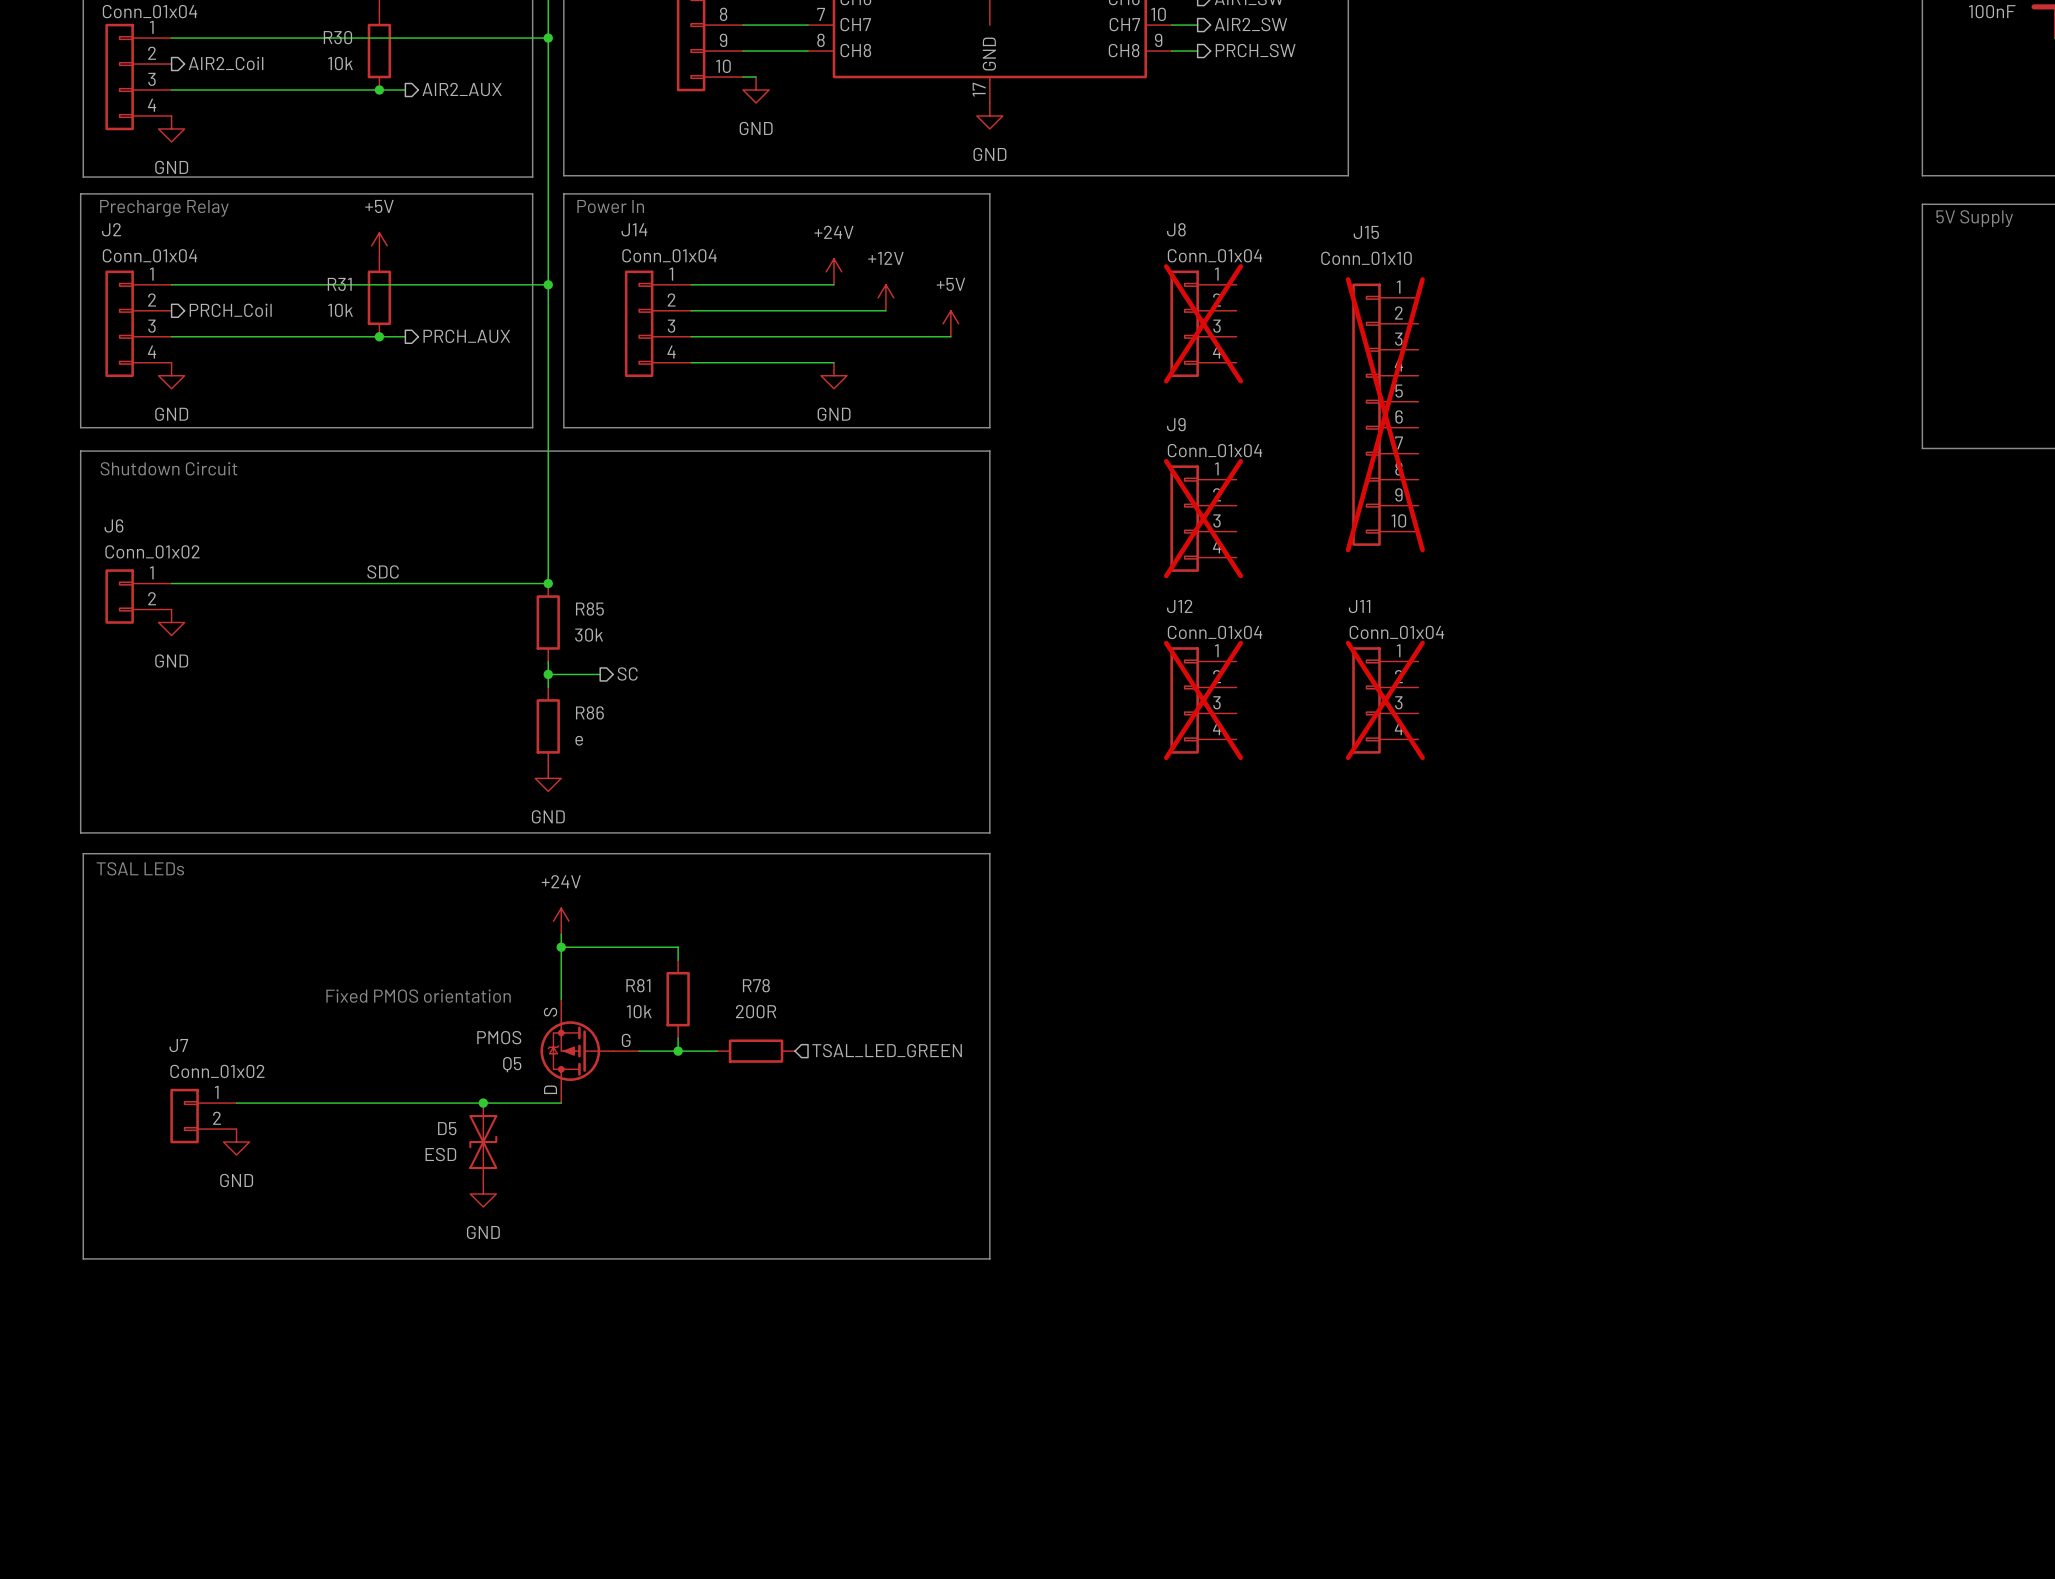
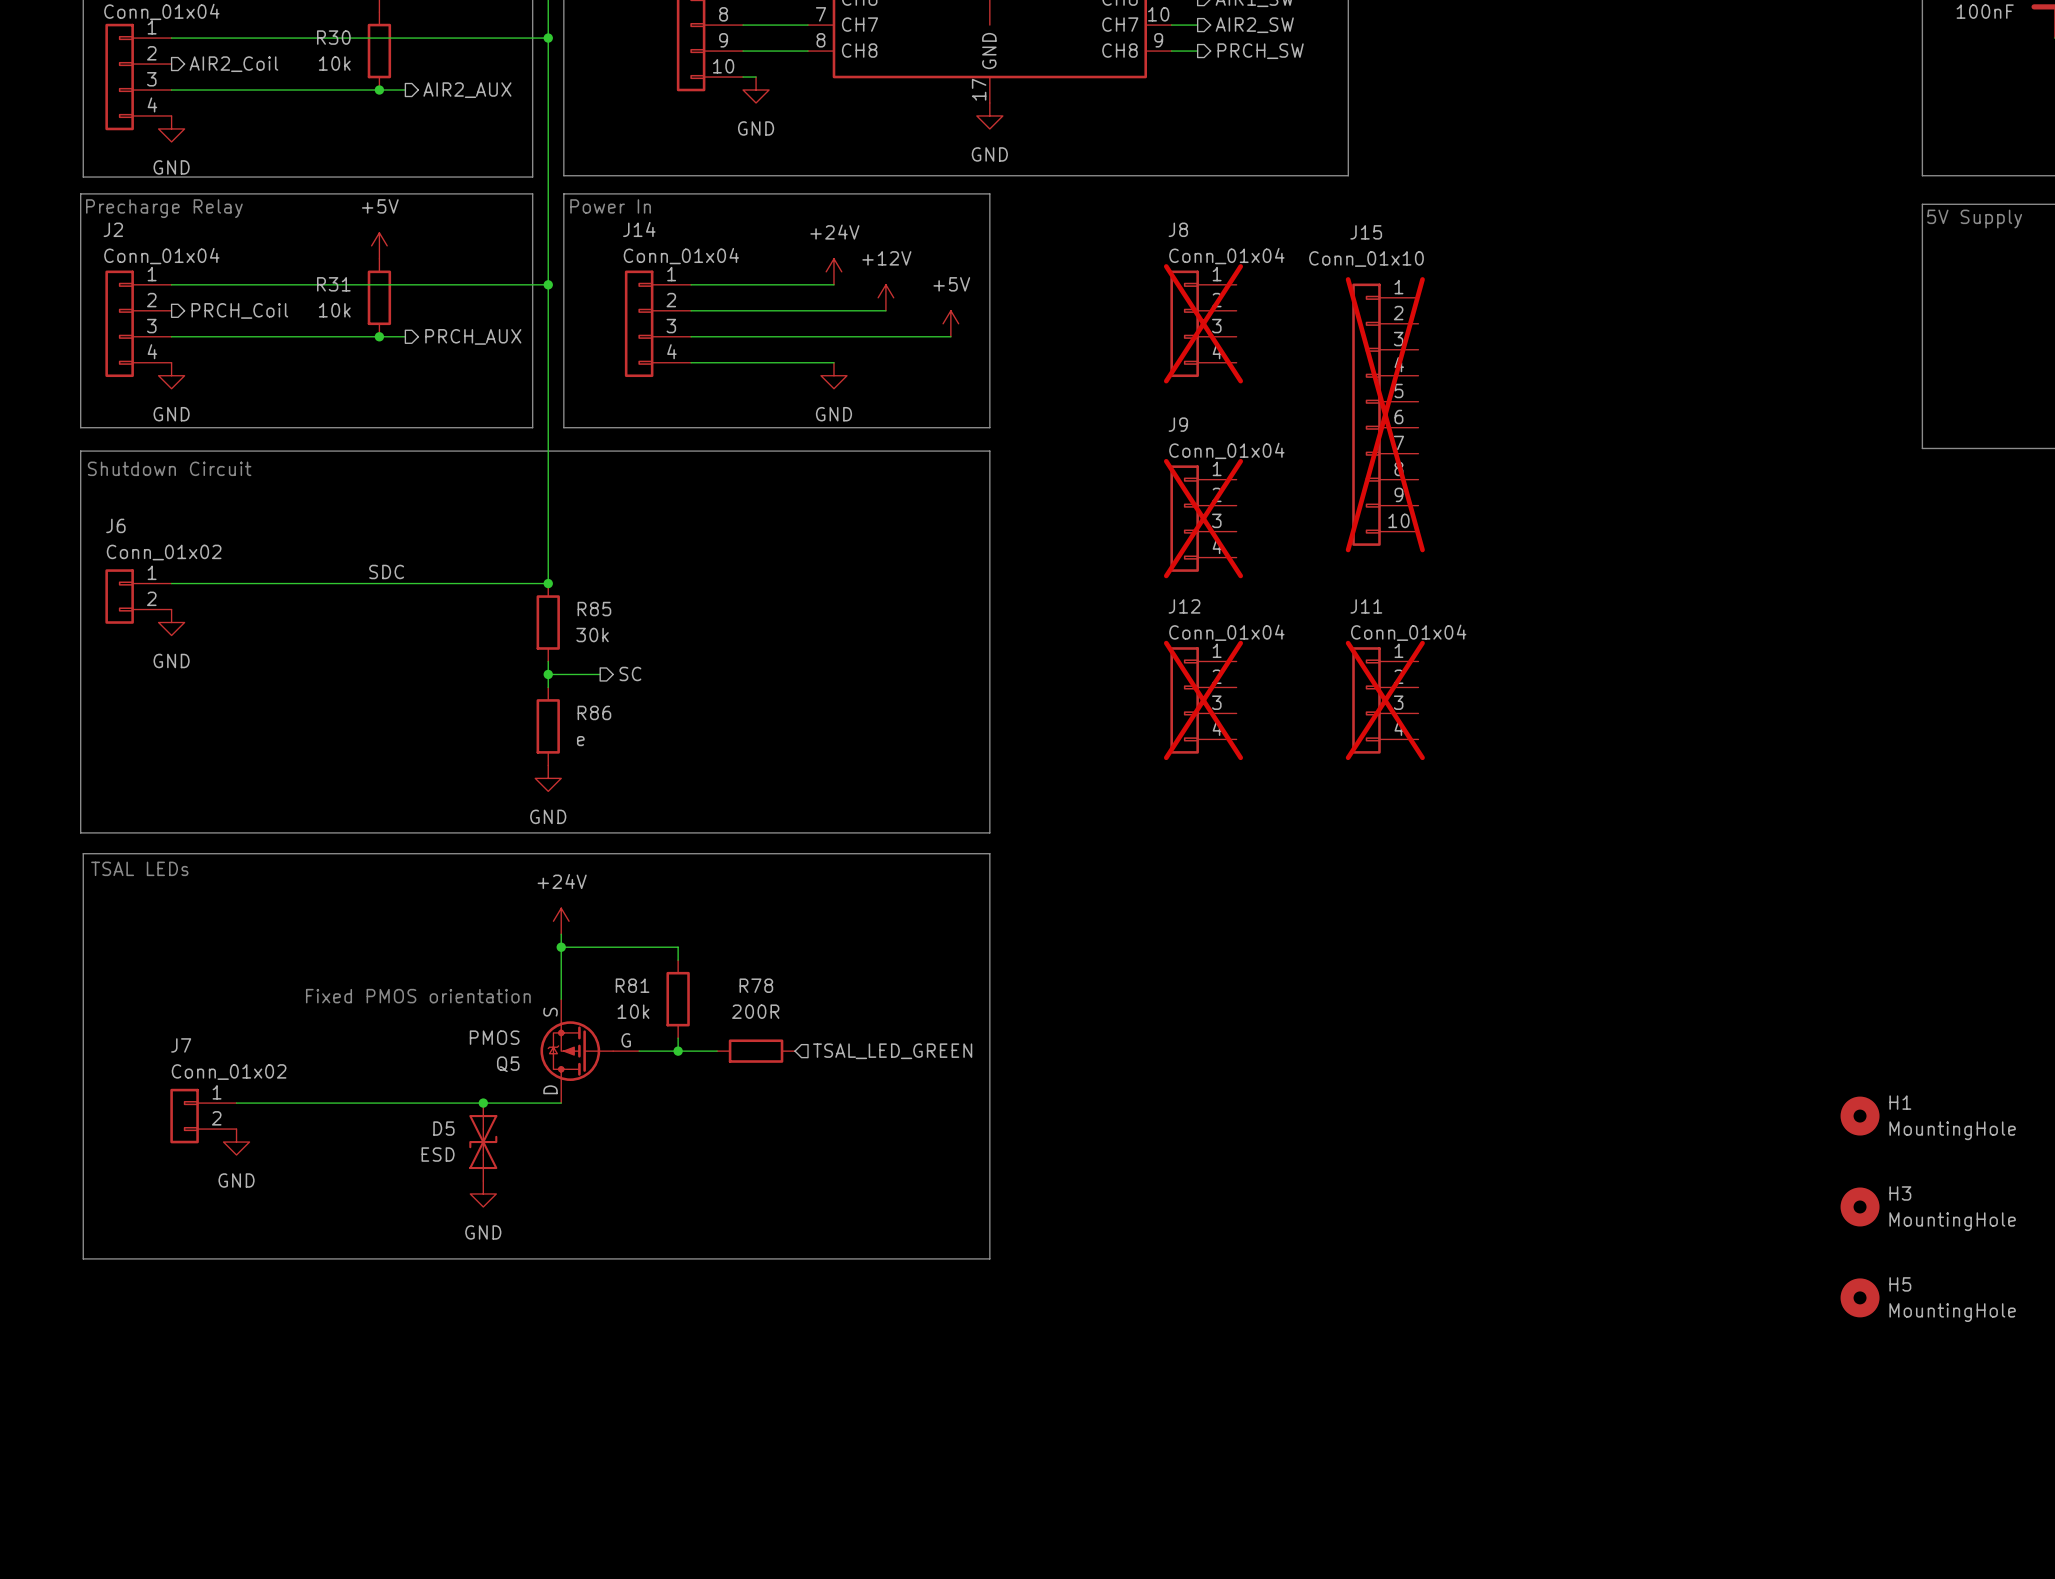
H1: none -> MountingHole (1860, 1116)
H3: none -> MountingHole (1860, 1206)
H5: none -> MountingHole (1860, 1297)

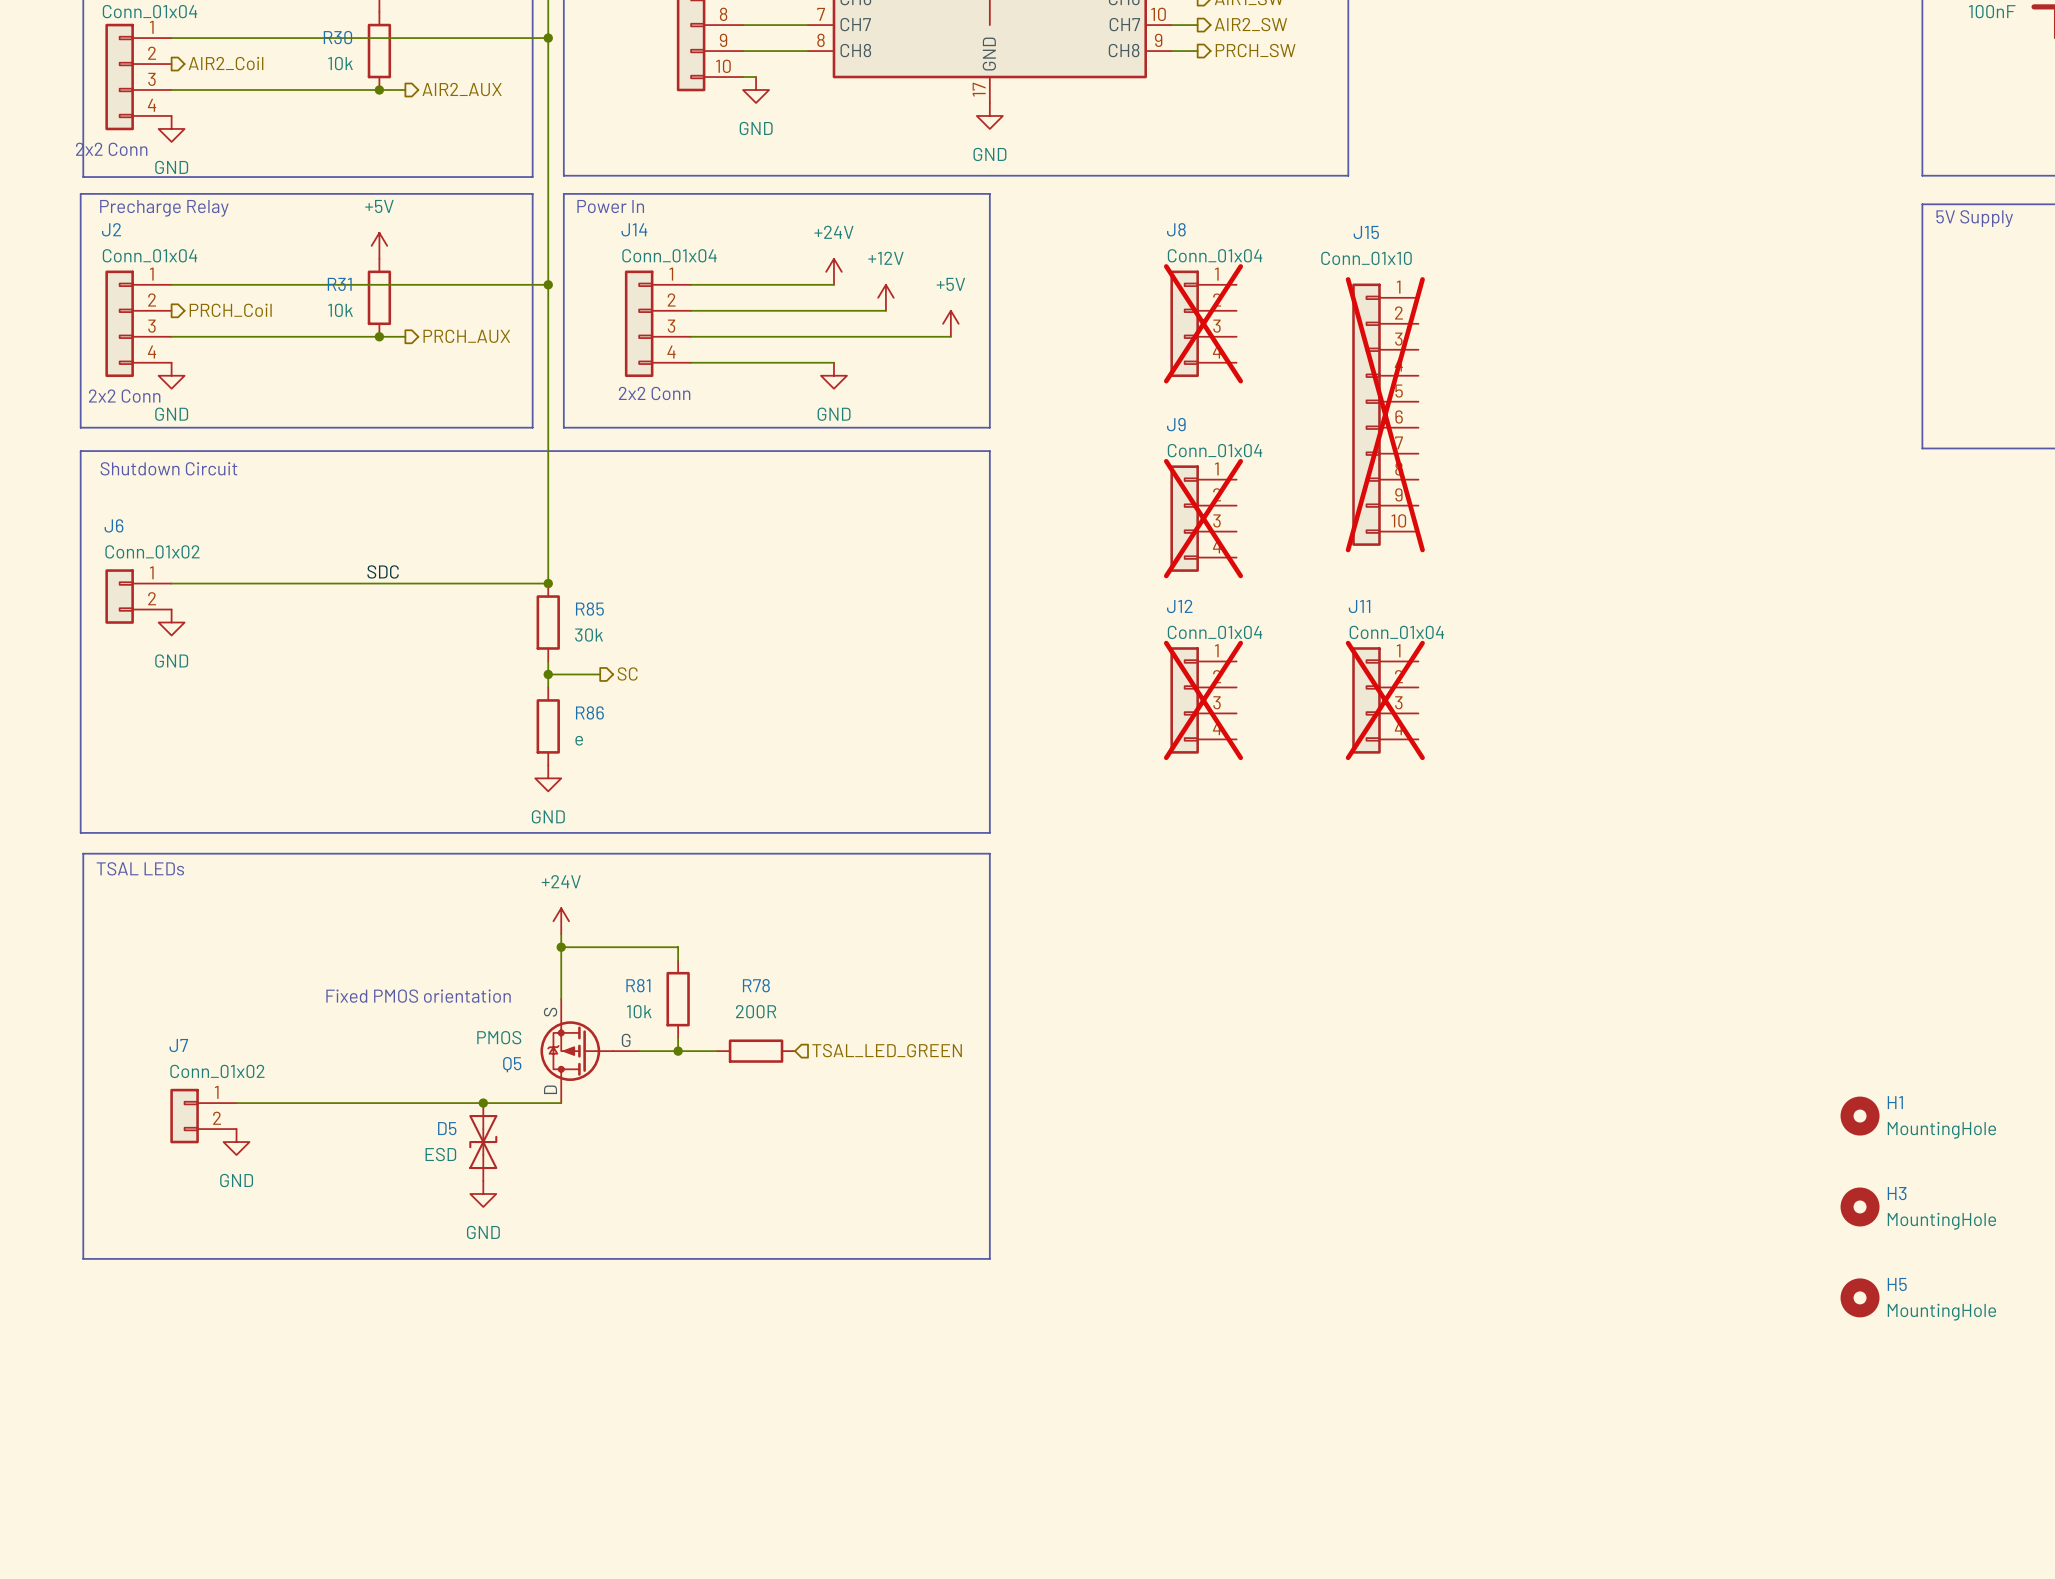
text: none -> 2x2 Conn (111, 149)
text: none -> 2x2 Conn (654, 393)
text: none -> 2x2 Conn (124, 396)

